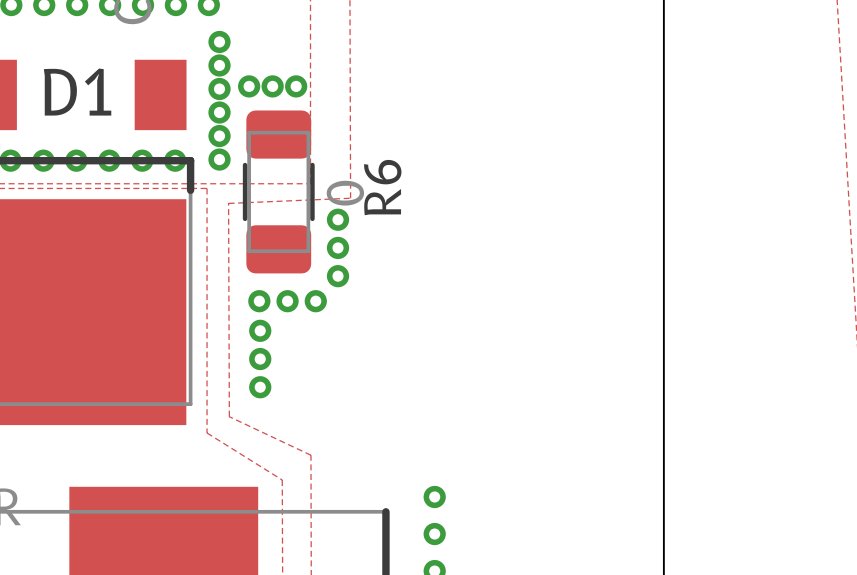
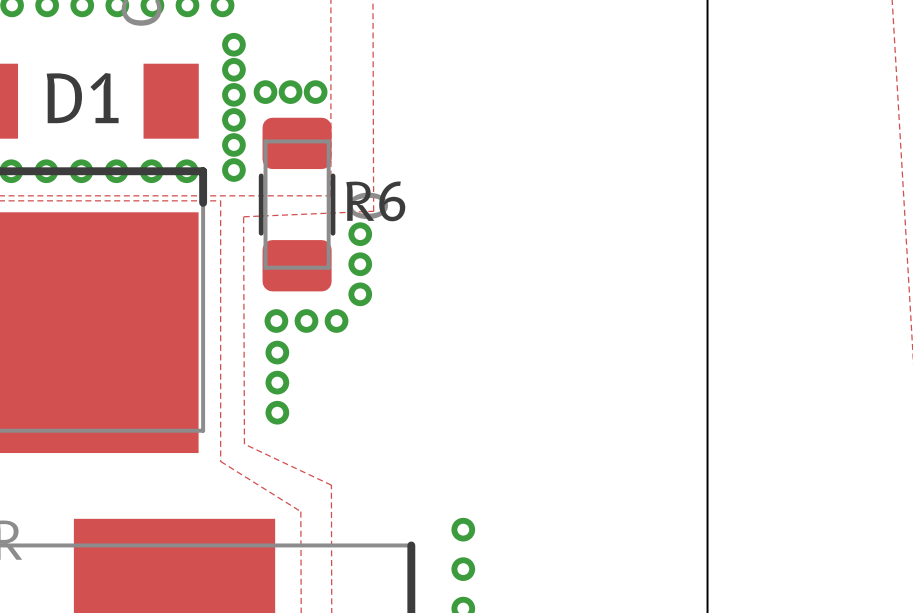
R6 name rotation: 0° (382, 187) -> 90° clockwise (375, 201)

